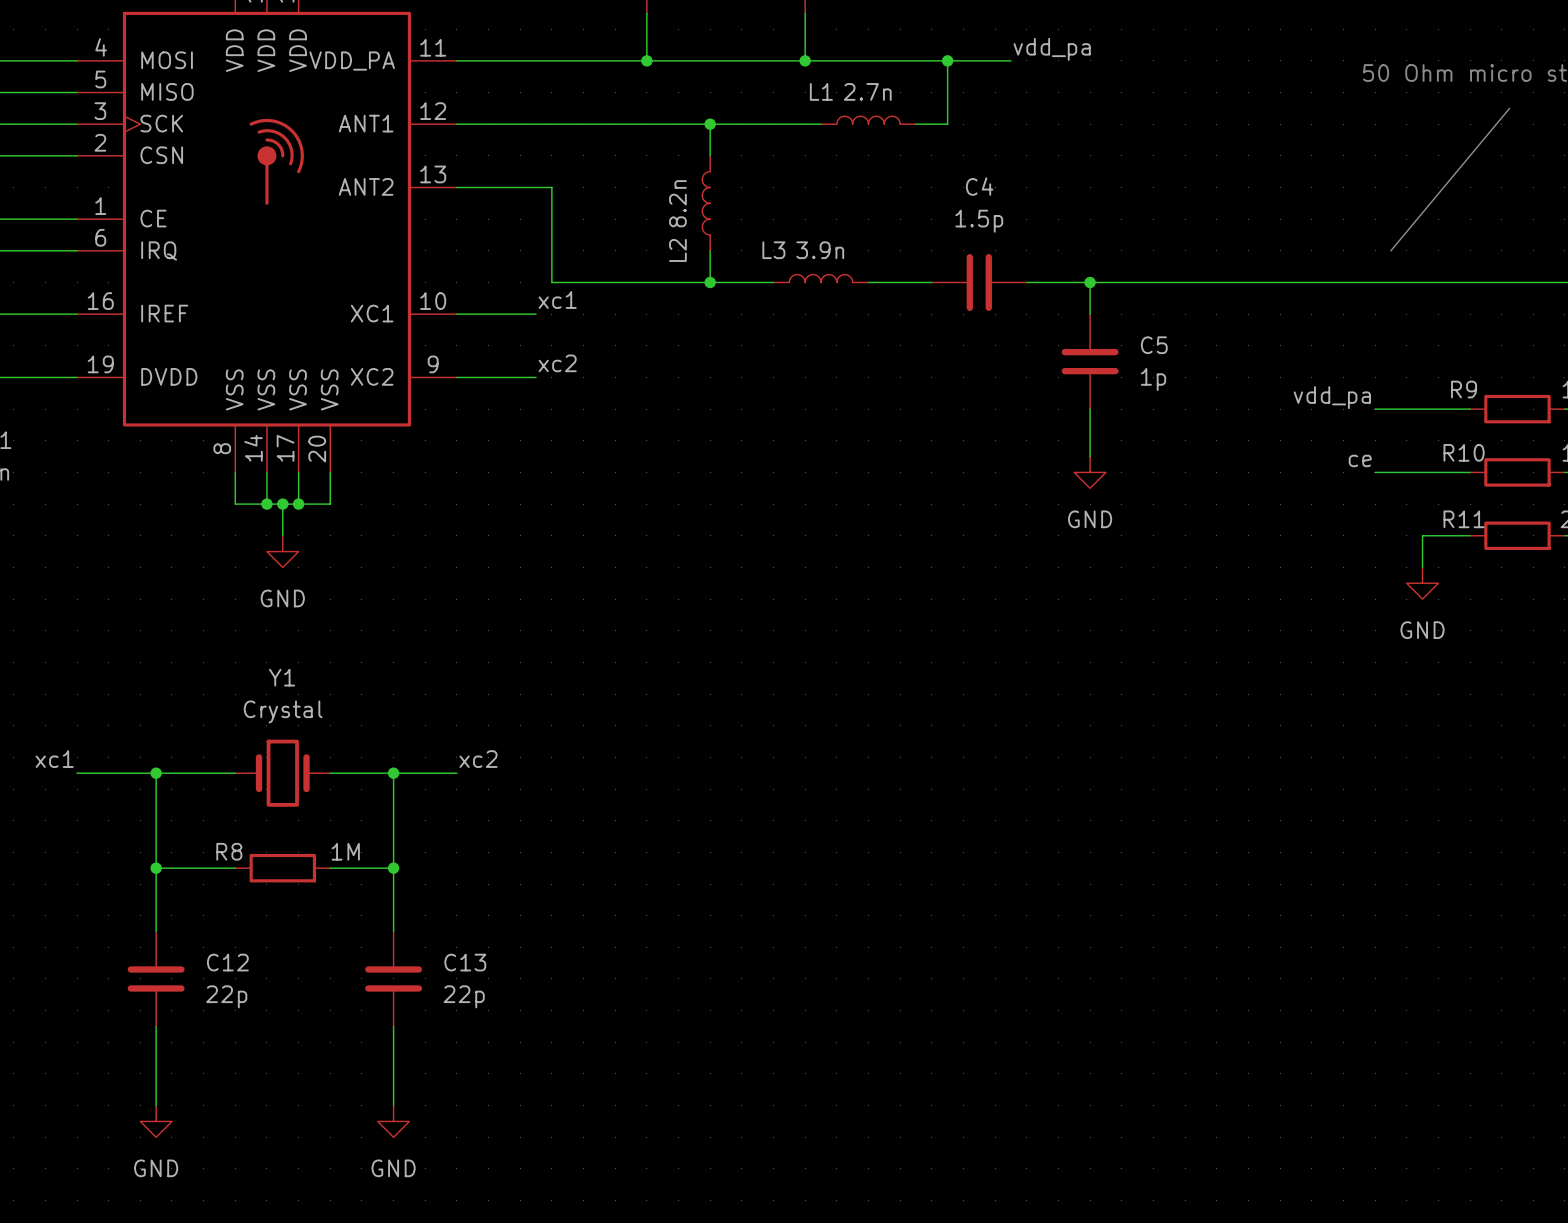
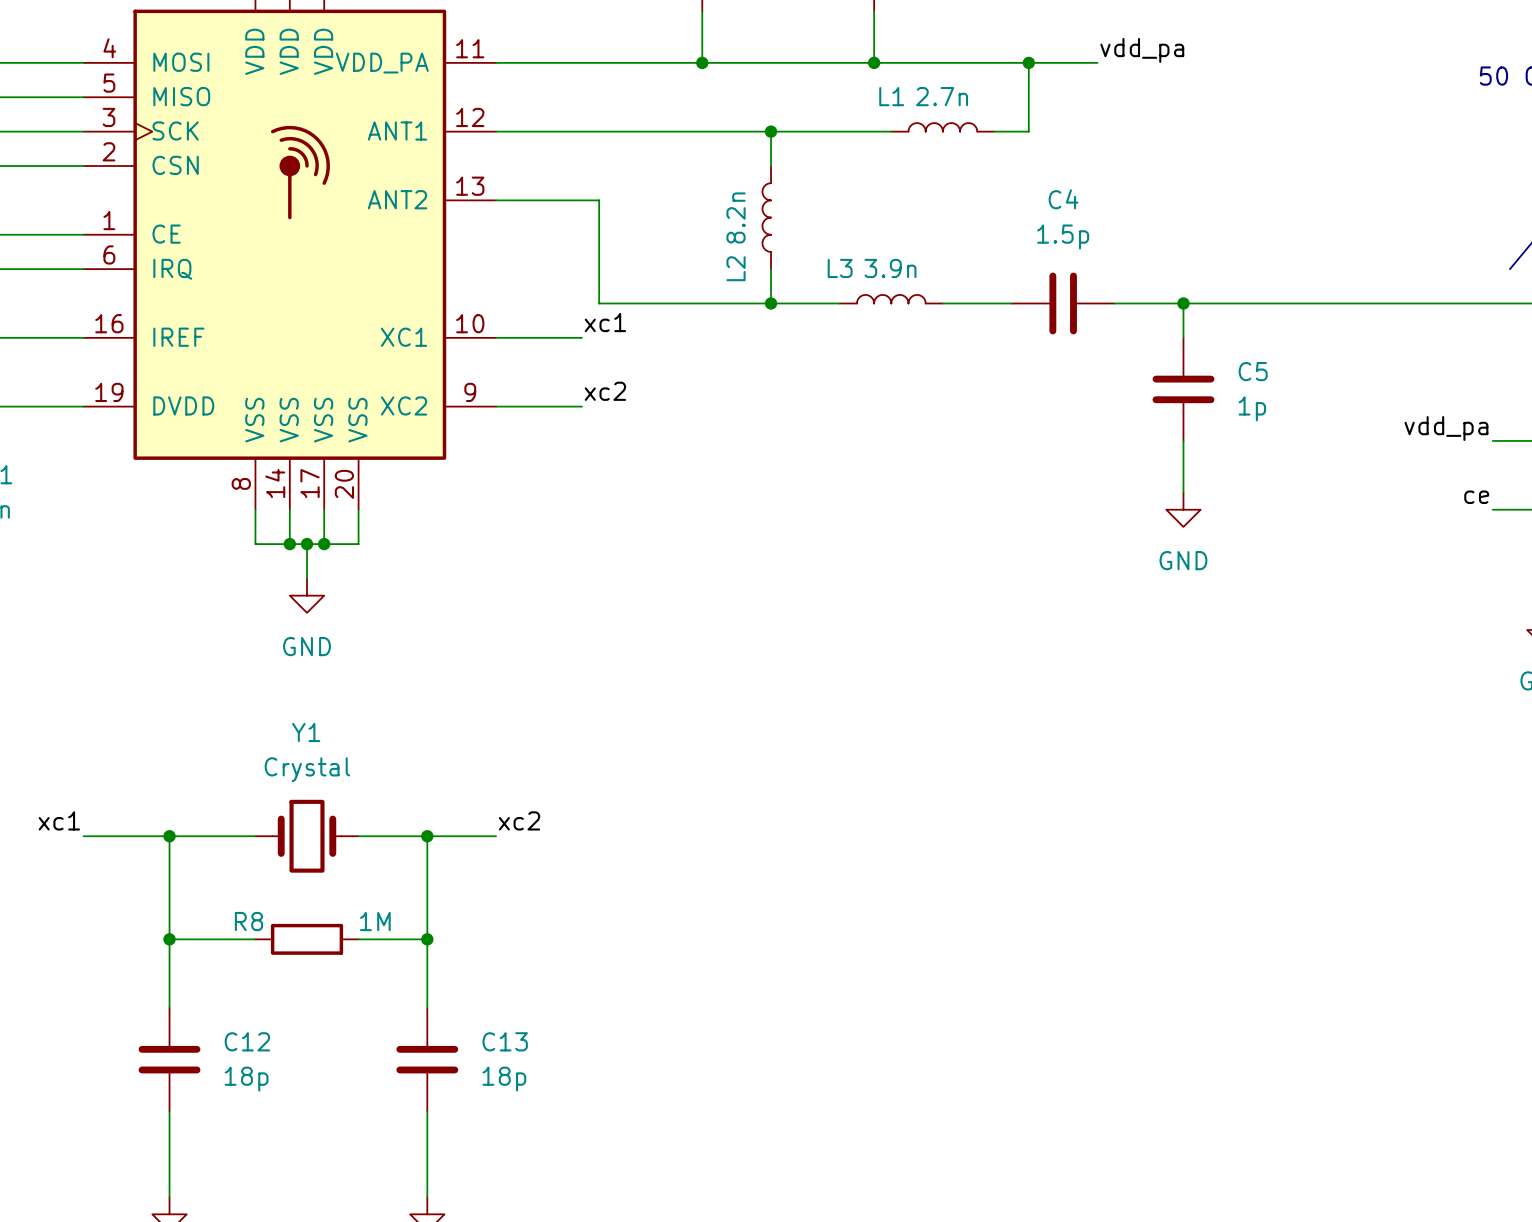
C12 value: 22p (226, 996) -> 18p (246, 1079)
C13 value: 22p (464, 996) -> 18p (504, 1079)

